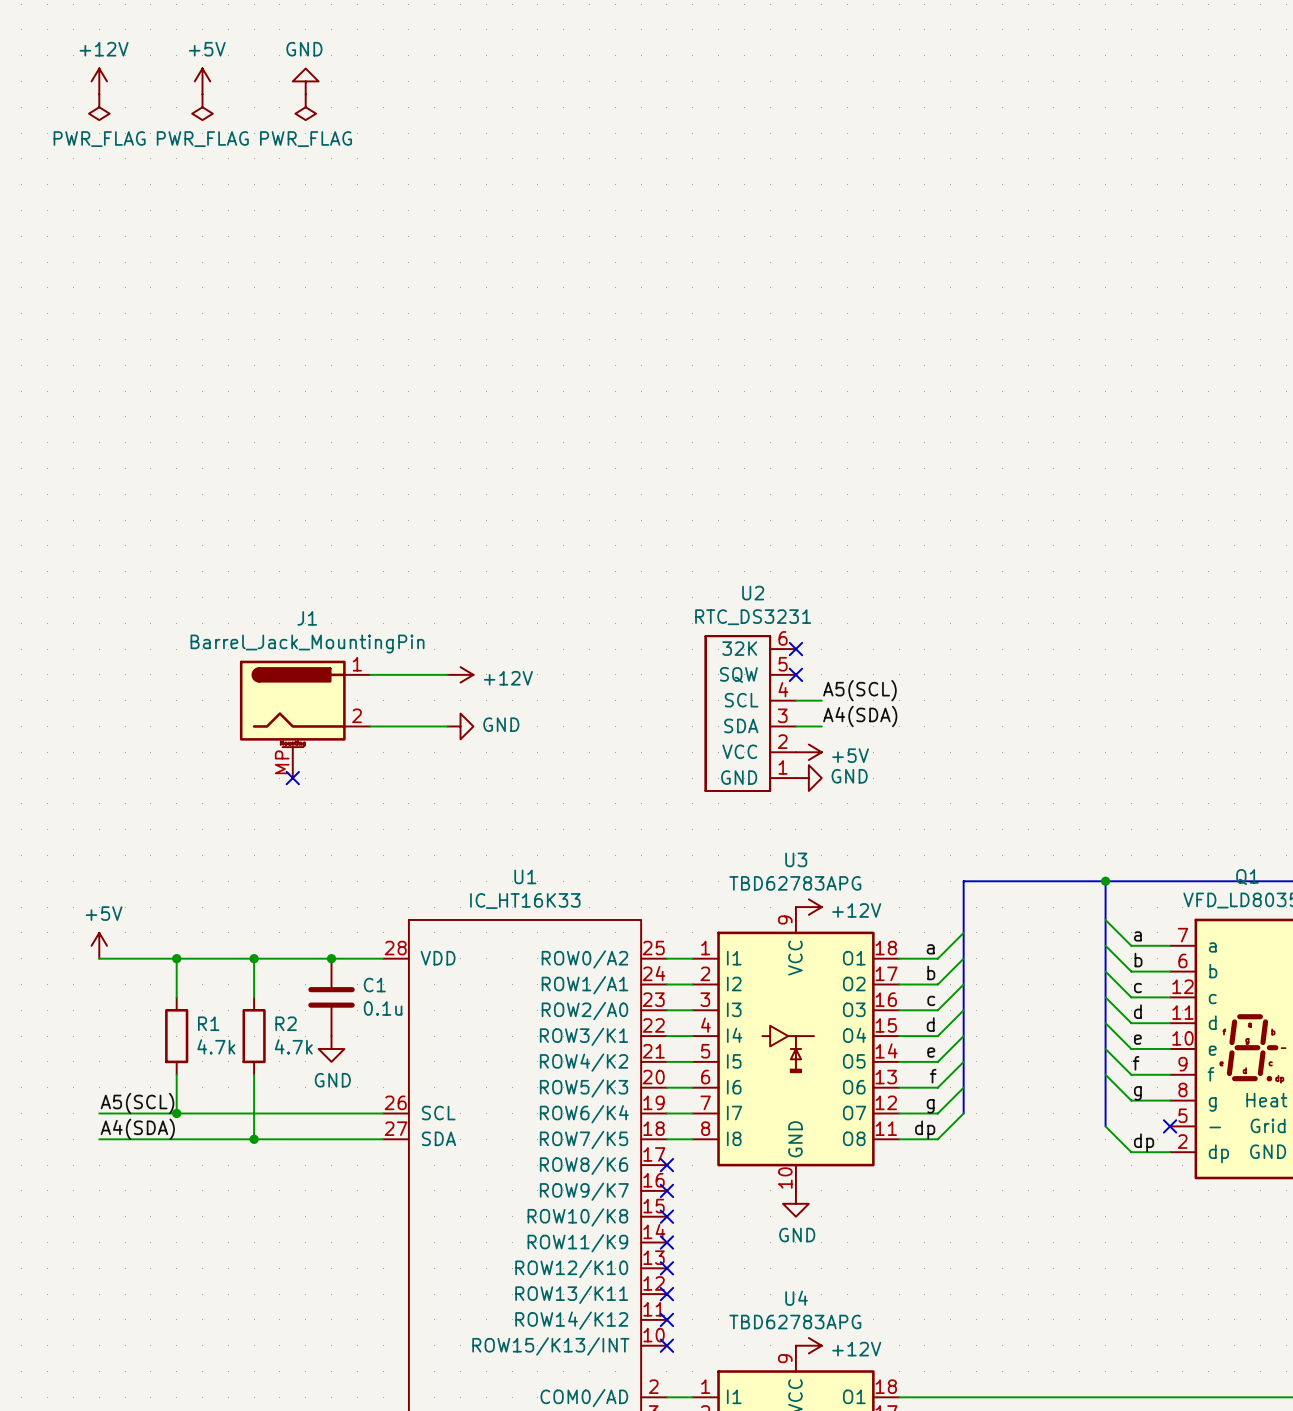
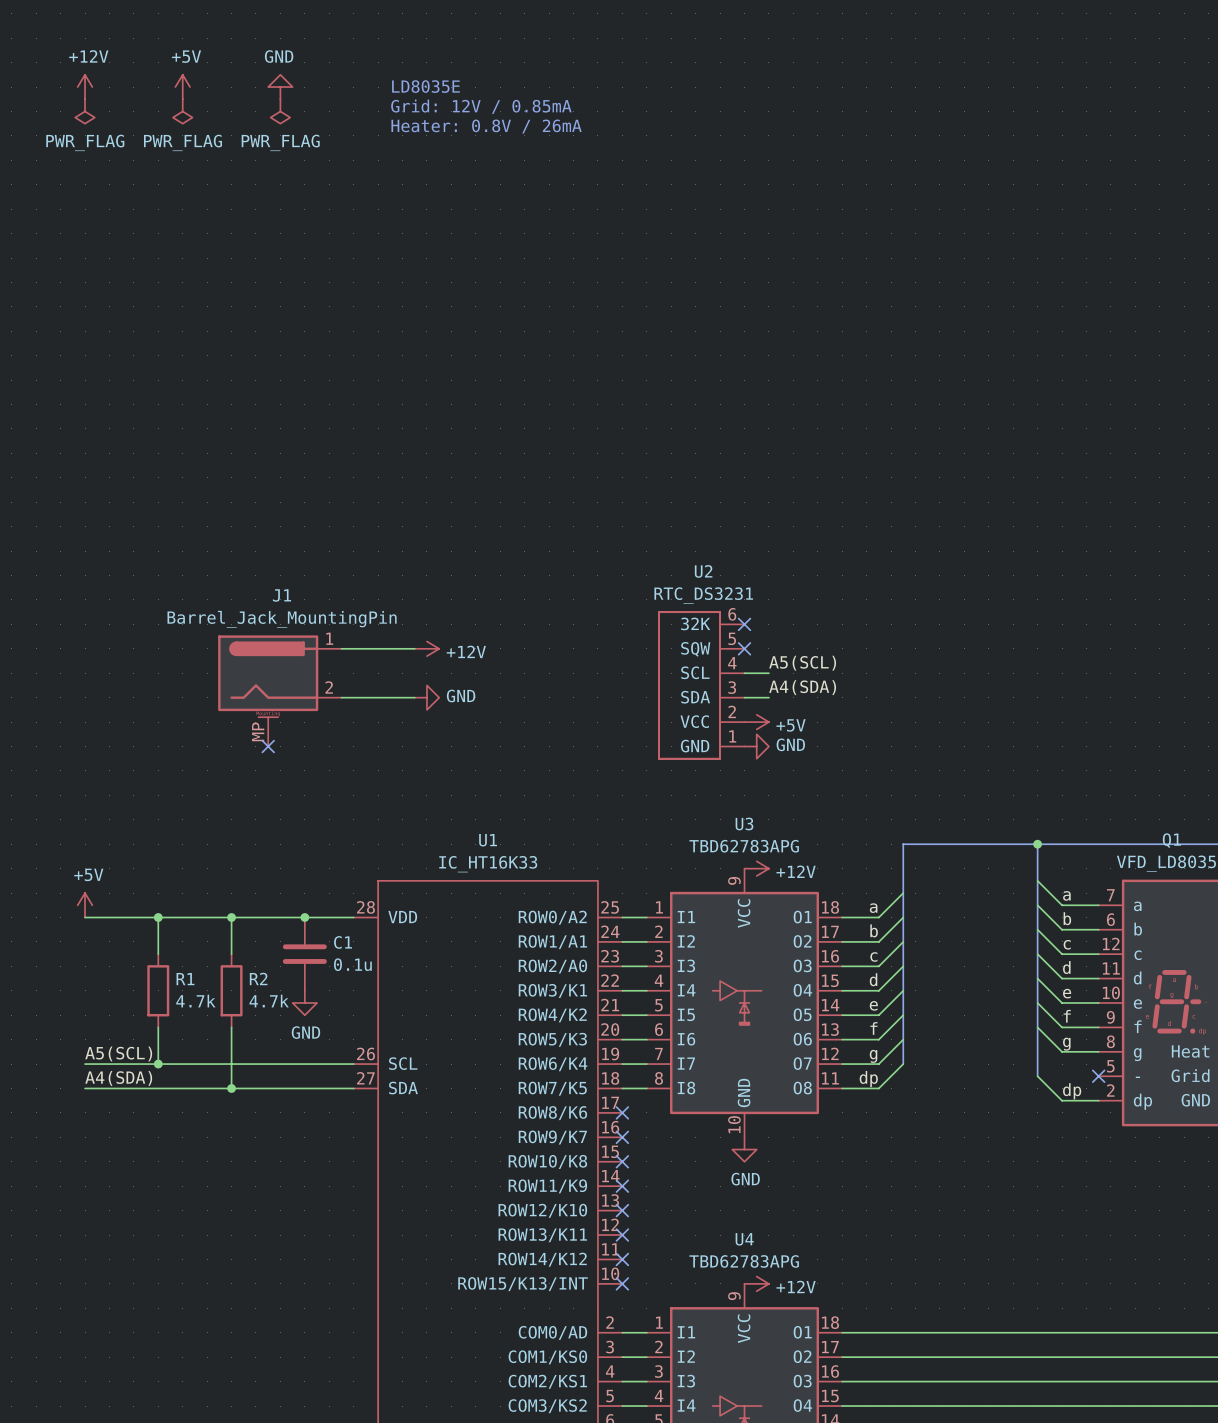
text: none -> LD8035E (425, 86)
text: none -> Grid: 12V / 0.85mA (481, 106)
text: none -> Heater: 0.8V / 26mA (486, 126)

